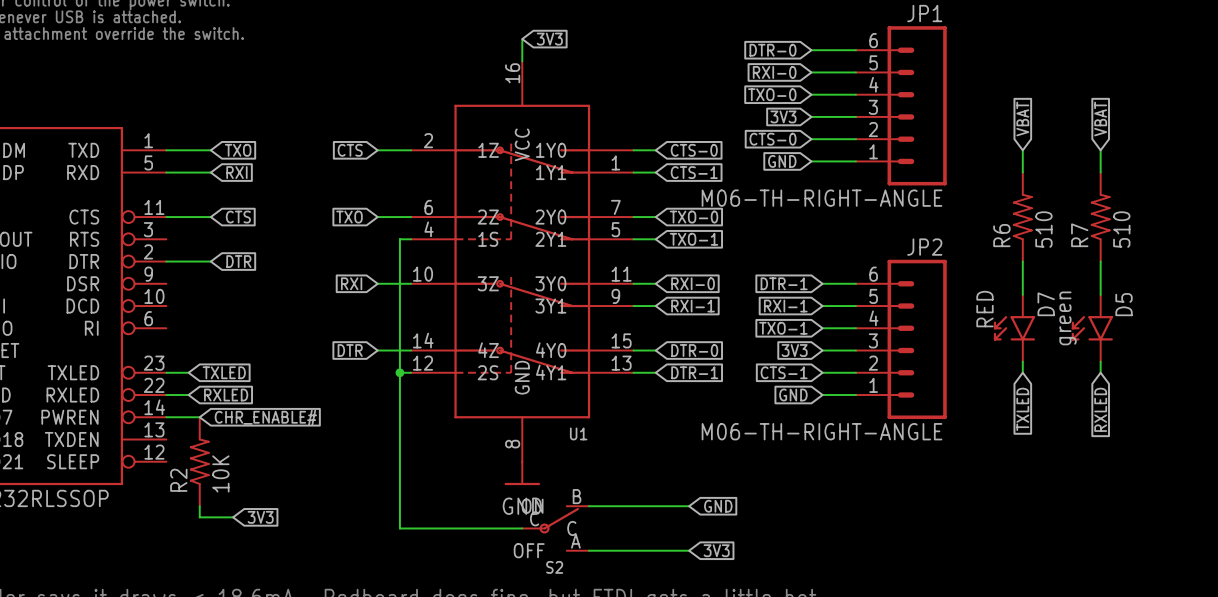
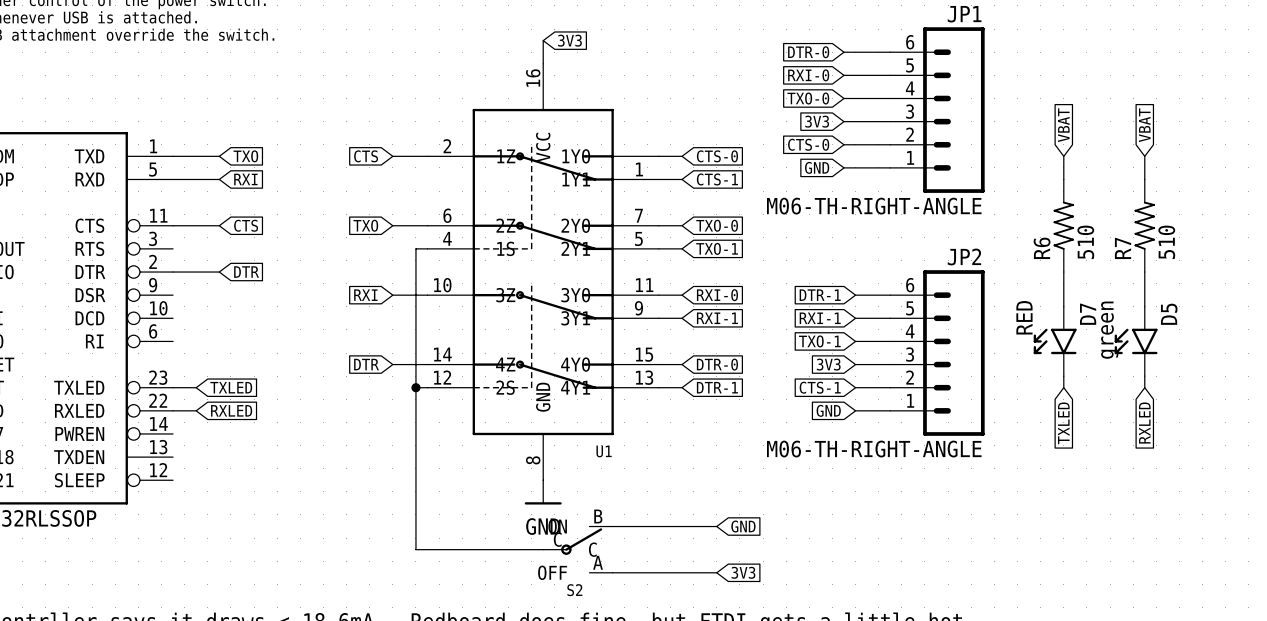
wire: (166, 417) (199, 417) -> none
global label: CHR_ENABLE# (265, 417) -> none
R2: 10K (199, 461) -> none
wire: (199, 506) (199, 517) (233, 517) -> none
global label: 3V3 (260, 517) -> none

